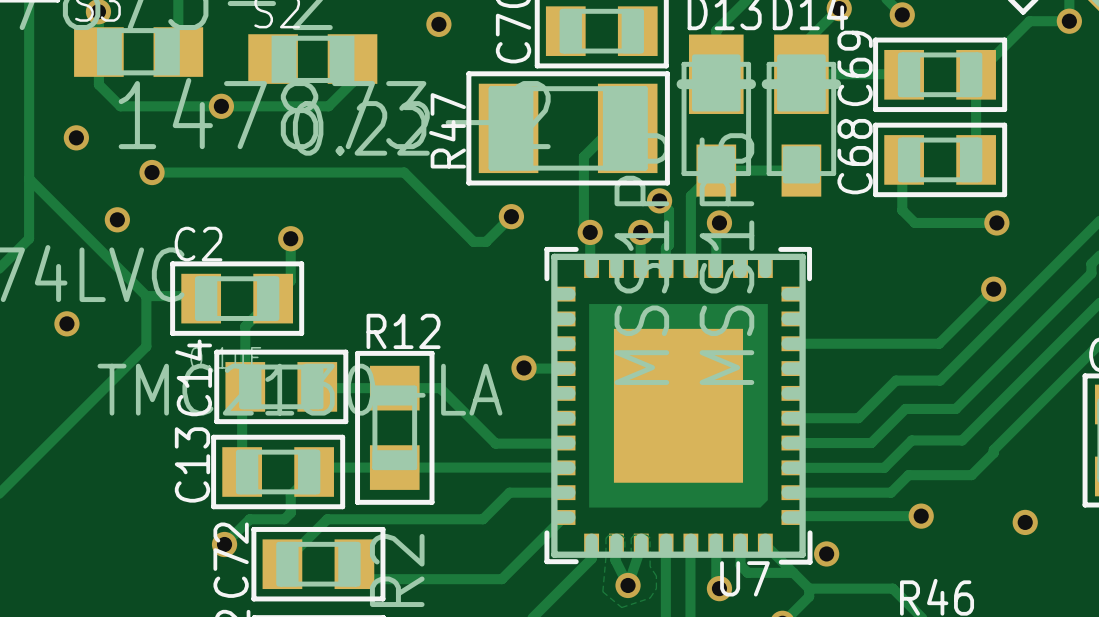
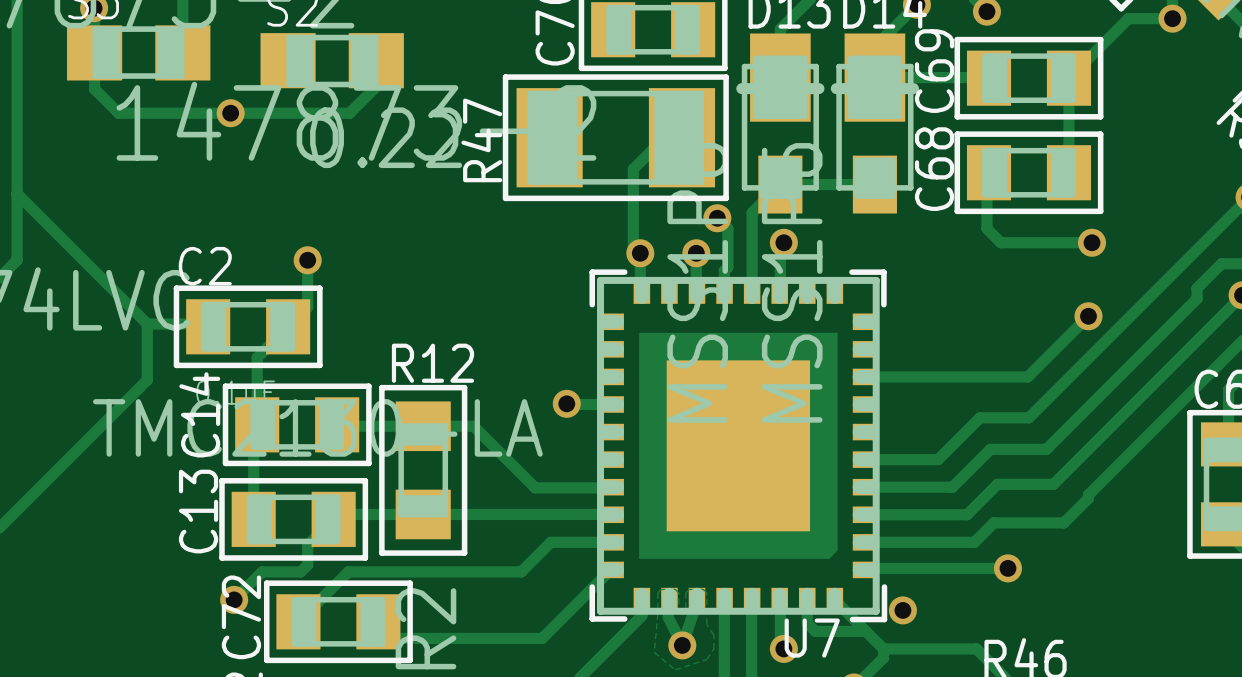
via: (438, 24) -> none
via: (76, 137) -> none
track: (152, 172) (404, 172) (473, 241) (486, 241) (511, 216) -> none
via: (152, 172) -> none
via: (511, 216) -> none
via: (117, 219) -> none
via: (66, 323) -> none
via: (1025, 522) -> none

